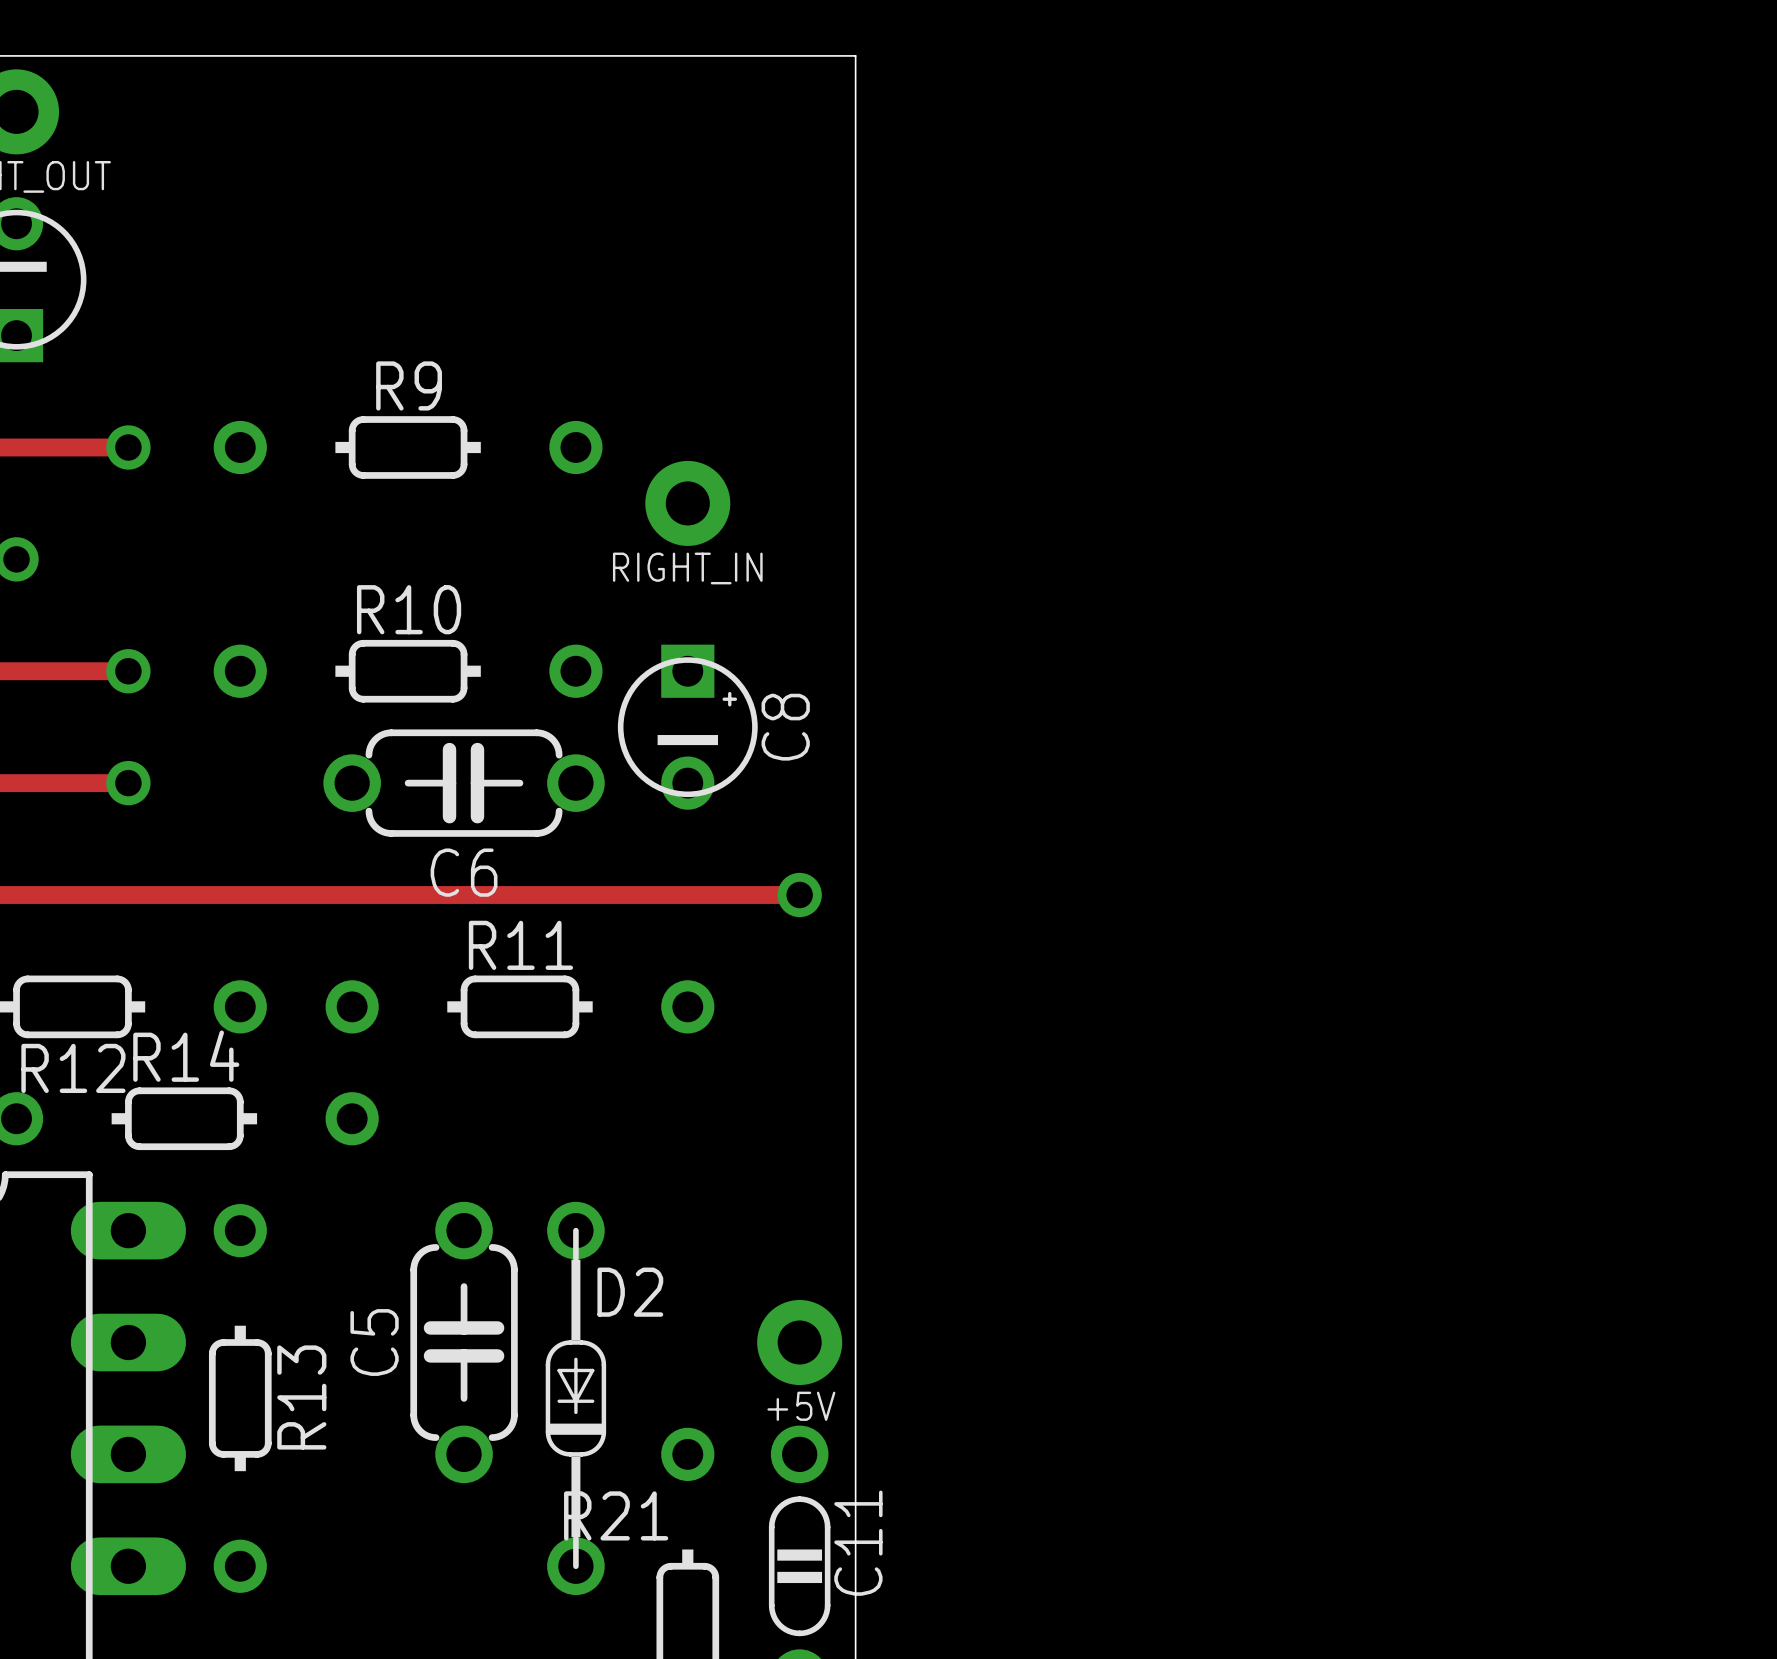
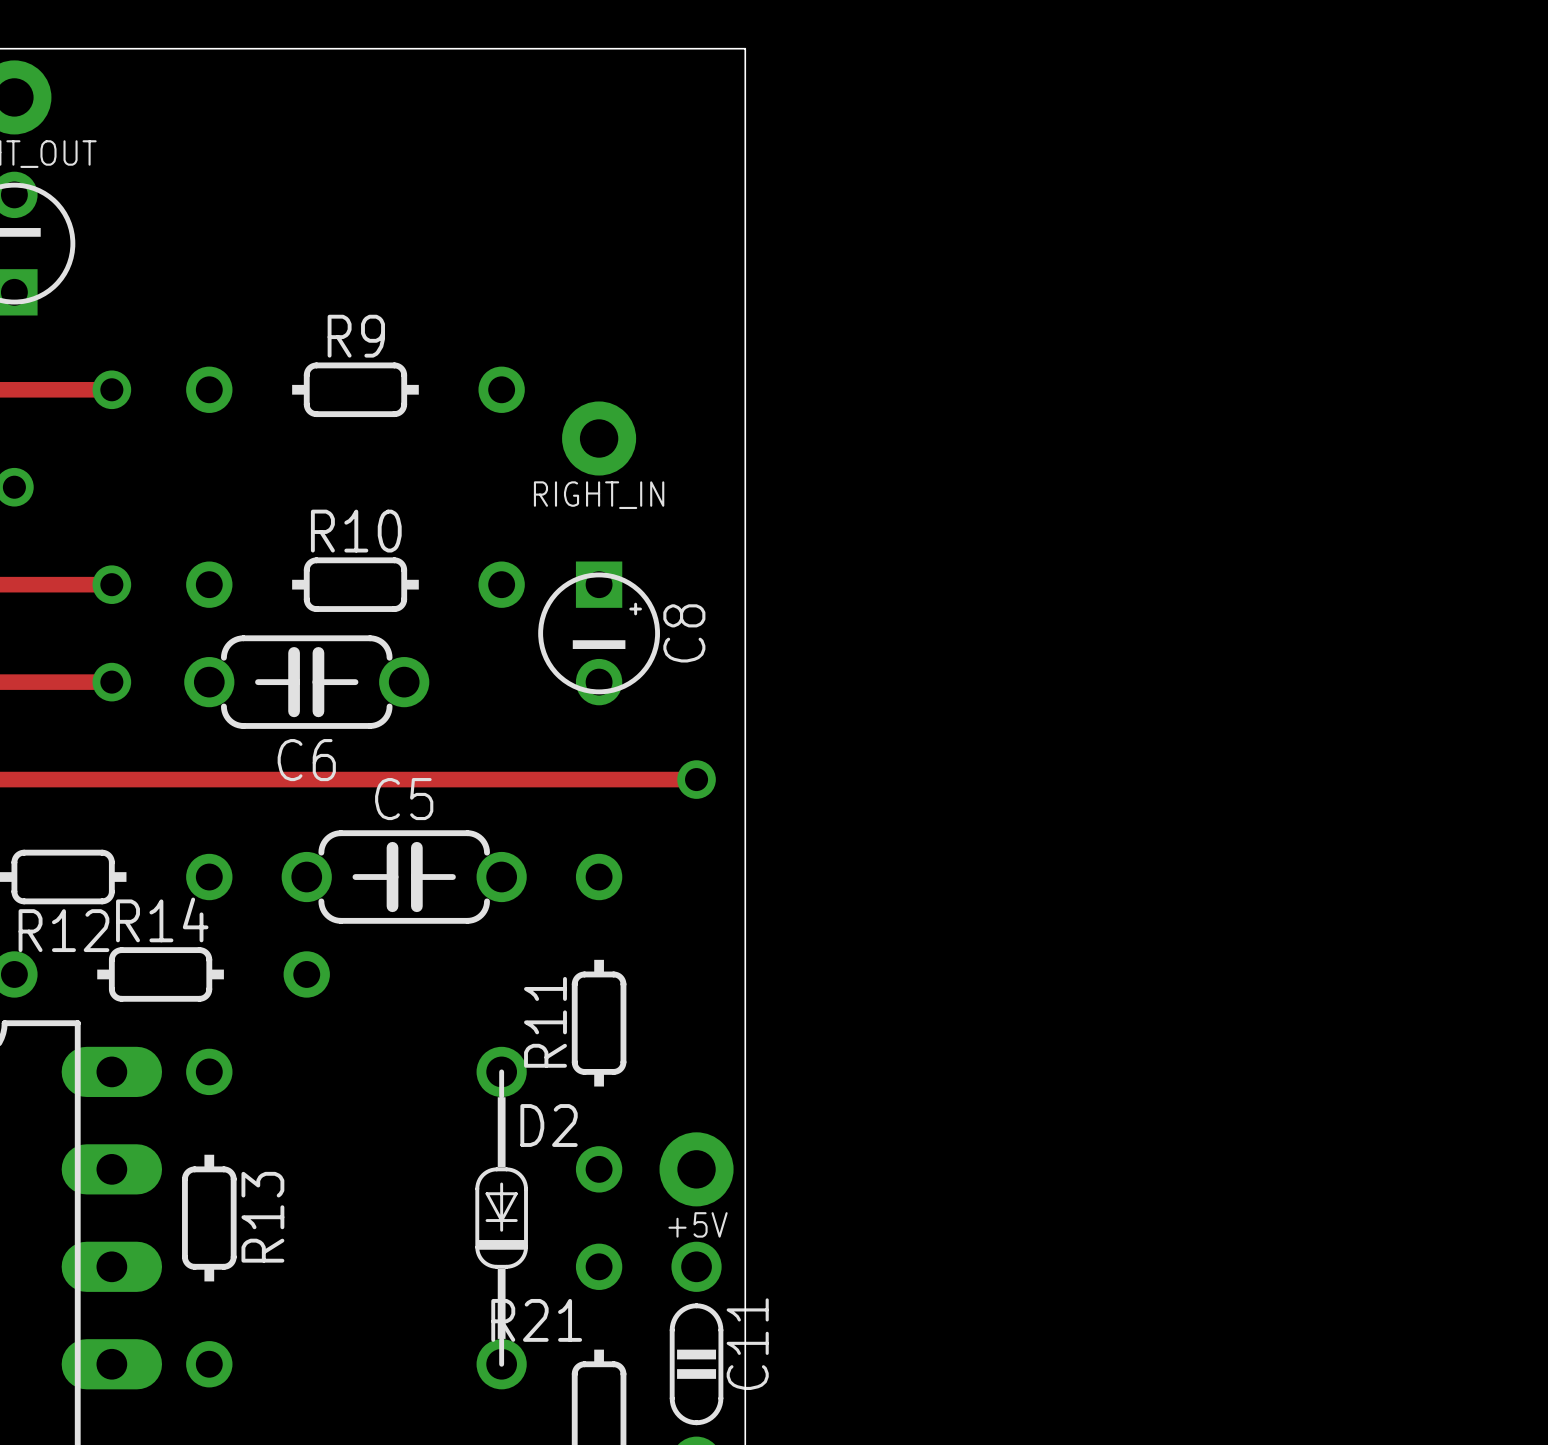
C6 position: (464, 783) -> (306, 682)
R11 rotation: 0° (519, 1006) -> 90° clockwise (599, 1023)
R11 position: (519, 1006) -> (599, 1023)
C5 rotation: 0° (464, 1342) -> 90° clockwise (404, 877)
C5 position: (464, 1342) -> (404, 877)

